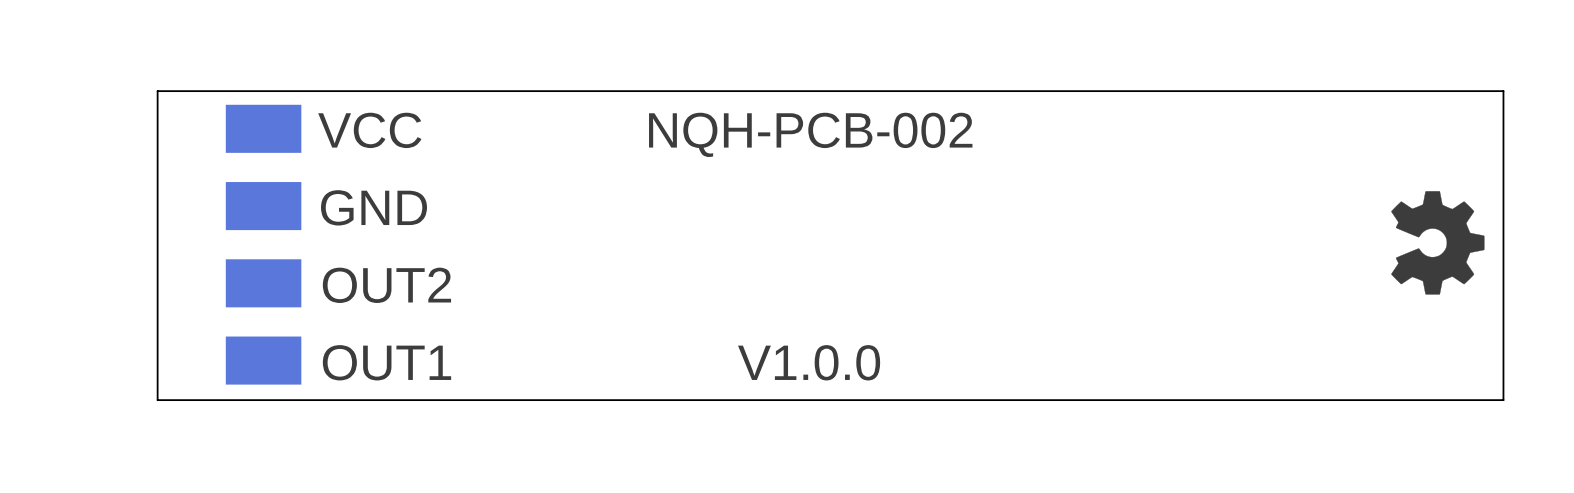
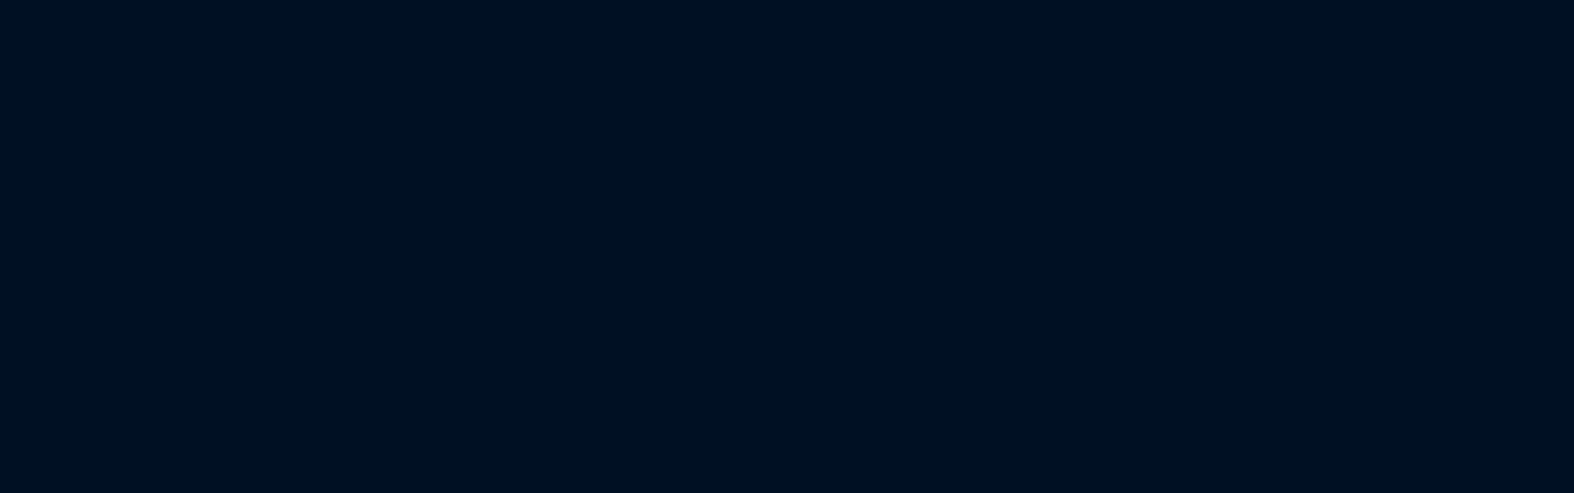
board edge: (1503, 91) (1503, 400) (157, 400) (157, 91) (1503, 91) -> none
text: VCC (369, 130) -> none
text: NQH-PCB-002 (810, 134) -> none
drawing: [1391, 191, 1485, 295] -> none
text: GND (373, 207) -> none
part: (263, 244) -> none
text: OUT2 (386, 285) -> none
text: OUT1 (386, 362) -> none
text: V1.0.0 (809, 362) -> none

